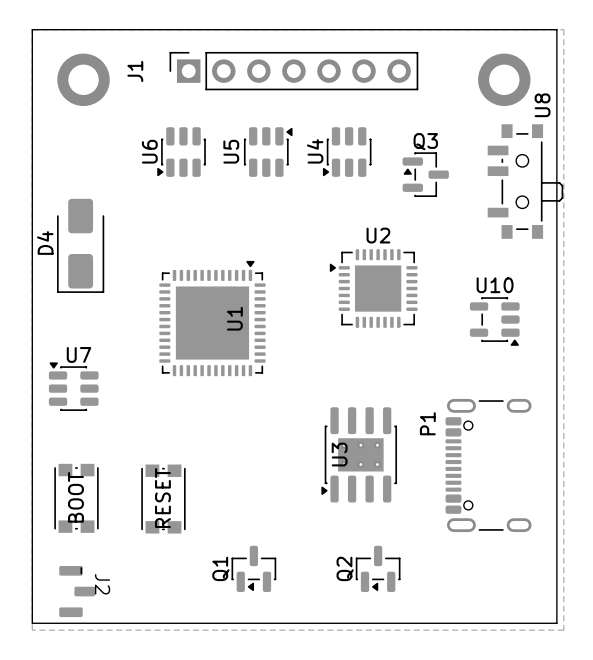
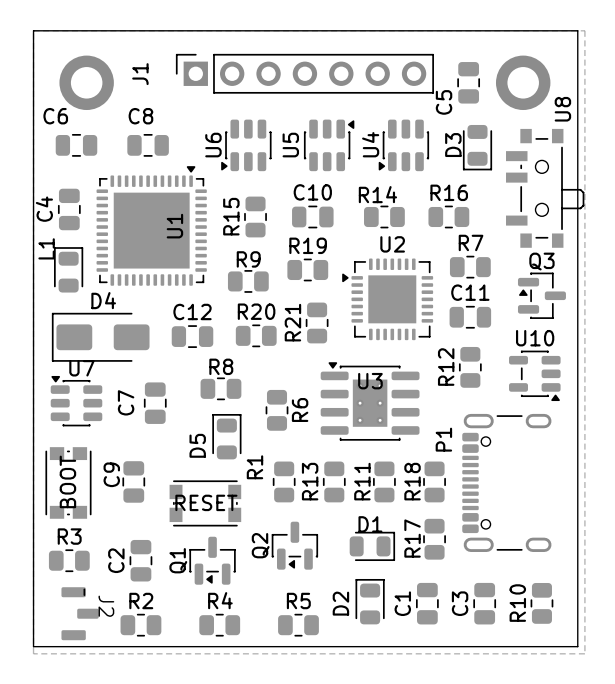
C5: none -> (468, 82)
C6: none -> (76, 145)
C8: none -> (148, 145)
D3: none -> (477, 147)
U6 position: (181, 152) -> (246, 145)
U5 position: (268, 152) -> (329, 145)
U4 position: (347, 152) -> (403, 145)
Q3 position: (425, 174) -> (541, 295)
C4: none -> (69, 209)
R15: none -> (255, 216)
C10: none -> (312, 216)
R14: none -> (384, 216)
R16: none -> (448, 216)
D4 rotation: 0° (80, 245) -> 90° clockwise (100, 337)
D4 position: (80, 245) -> (100, 337)
R7: none -> (470, 267)
L1: none -> (68, 269)
R19: none -> (307, 269)
R9: none -> (248, 281)
C11: none -> (470, 317)
R21: none -> (317, 322)
U1 position: (212, 318) -> (151, 225)
U10 position: (494, 321) -> (534, 375)
R20: none -> (256, 335)
C12: none -> (192, 336)
R12: none -> (470, 367)
R8: none -> (220, 388)
C7: none -> (155, 403)
R6: none -> (277, 410)
D5: none -> (226, 436)
U3 rotation: 0° (359, 454) -> 90° clockwise (370, 401)
U3 position: (359, 454) -> (370, 401)
C9: none -> (133, 481)
R1: none -> (284, 481)
R13: none -> (334, 481)
R11: none -> (384, 481)
R18: none -> (434, 481)
part position: (76, 498) -> (68, 482)
part rotation: 0° (163, 499) -> 90° clockwise (205, 503)
R17: none -> (434, 539)
D1: none -> (372, 546)
R3: none -> (69, 560)
C2: none -> (140, 560)
Q1 position: (253, 568) -> (212, 560)
Q2 position: (378, 568) -> (294, 545)
D2: none -> (370, 601)
C1: none -> (427, 603)
C3: none -> (484, 603)
R10: none -> (541, 603)
R2: none -> (140, 625)
R4: none -> (219, 625)
R5: none -> (298, 625)

